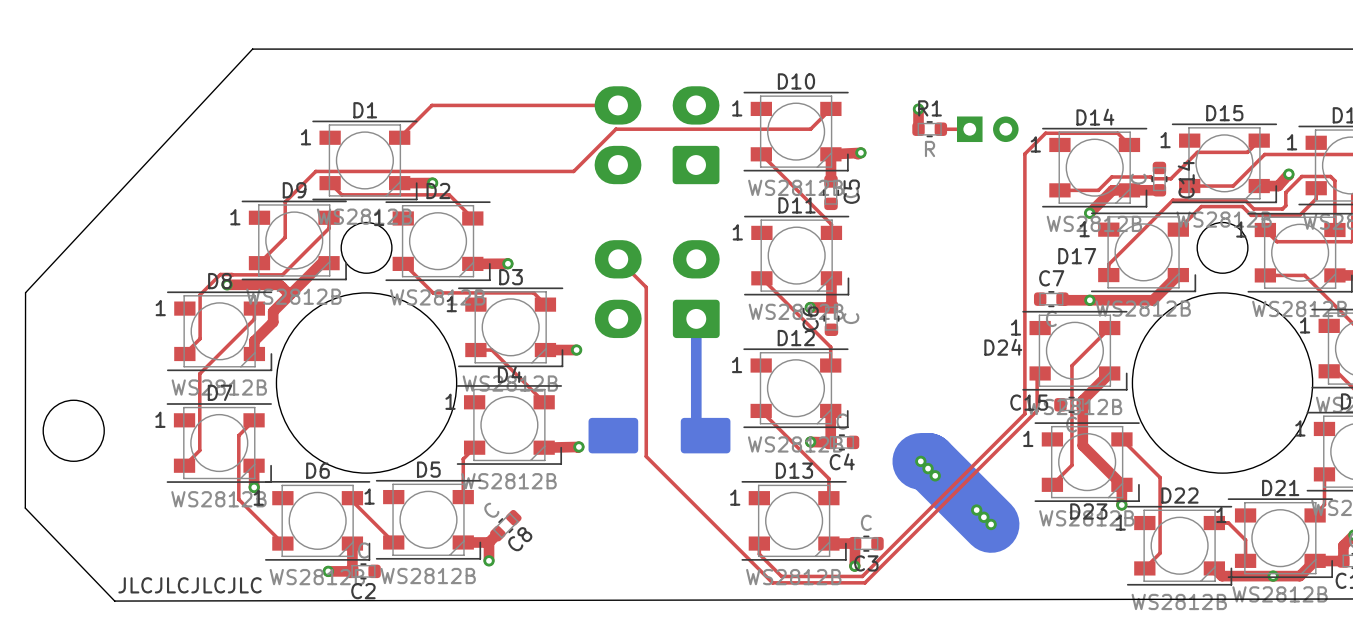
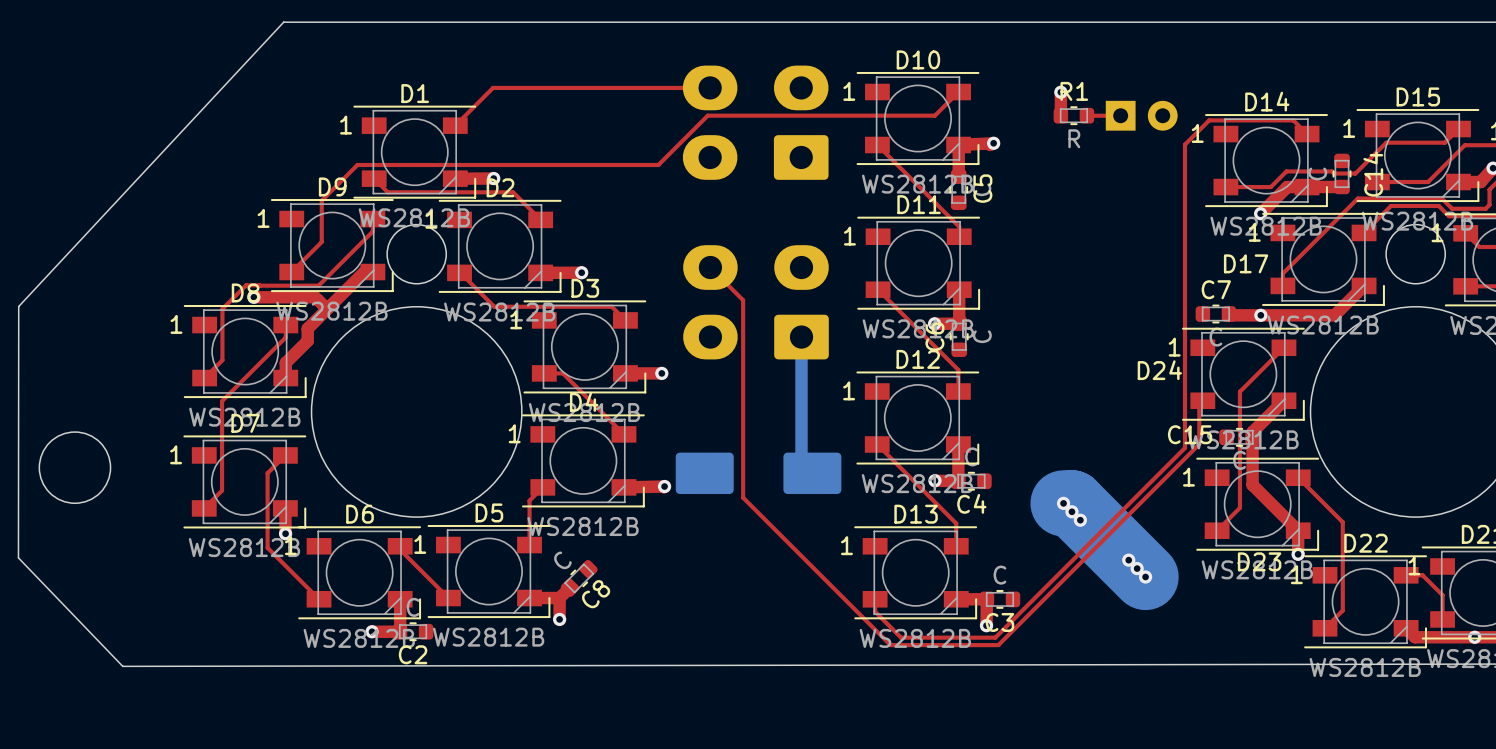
text: JLCJLCJLCJLC (190, 585) -> none

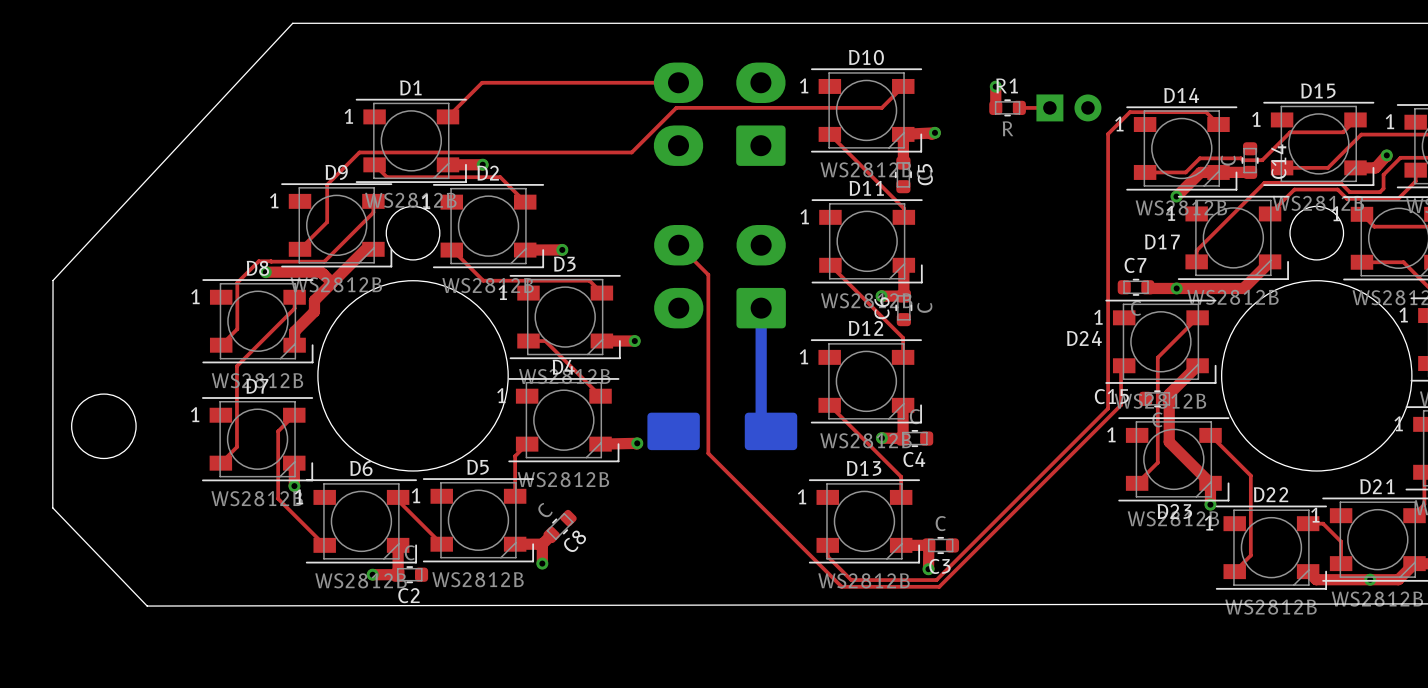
bottom track: (1063, 503) (1071, 503) (1145, 576) -> none
via: (1063, 503) -> none
via: (1071, 511) -> none
via: (1080, 520) -> none
via: (1128, 560) -> none
via: (1137, 568) -> none
via: (1145, 576) -> none

